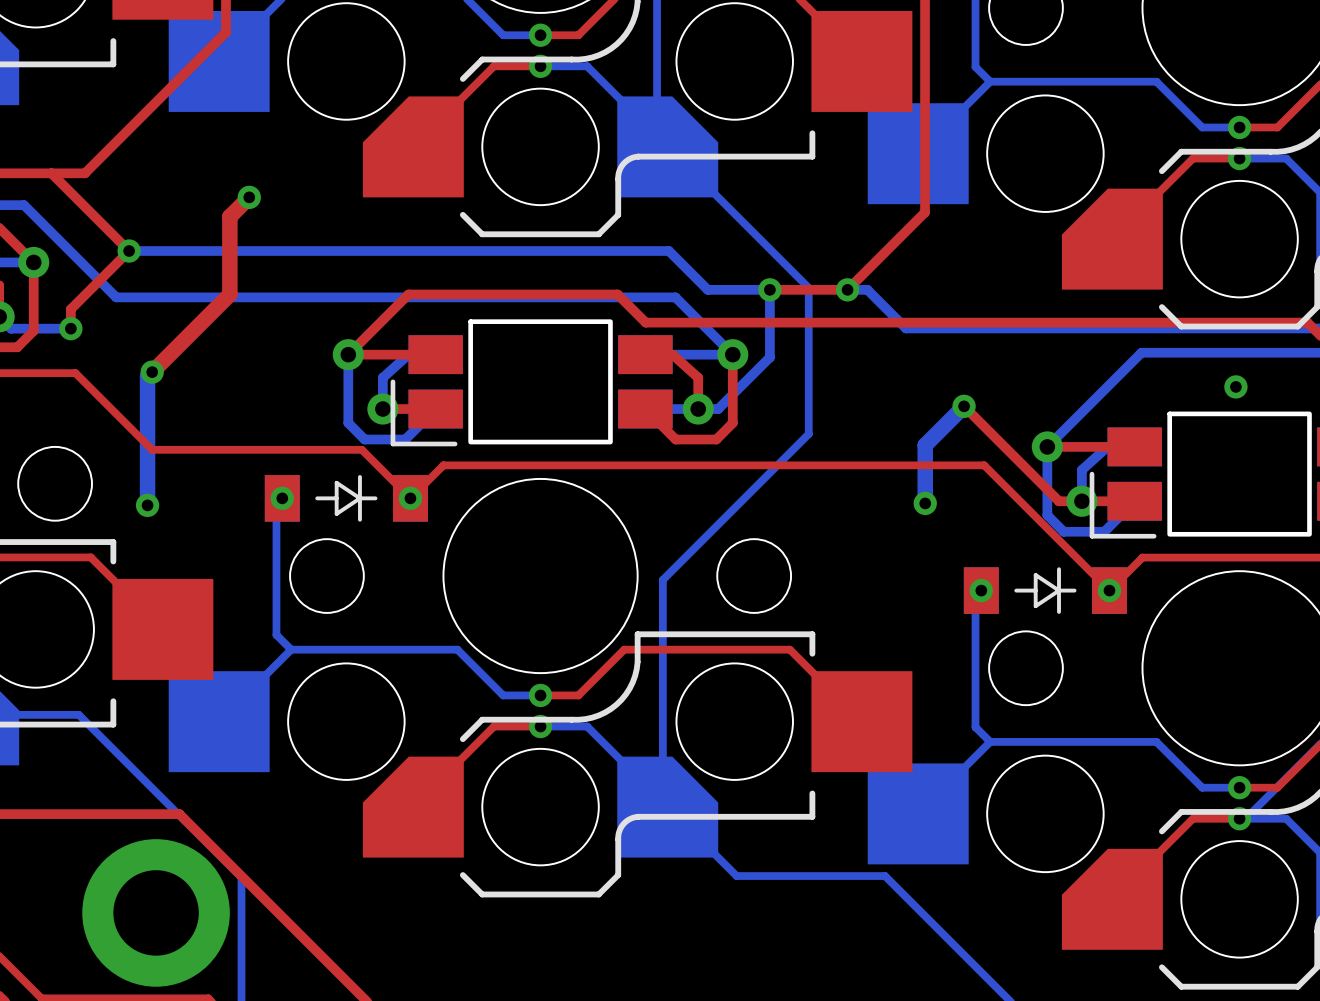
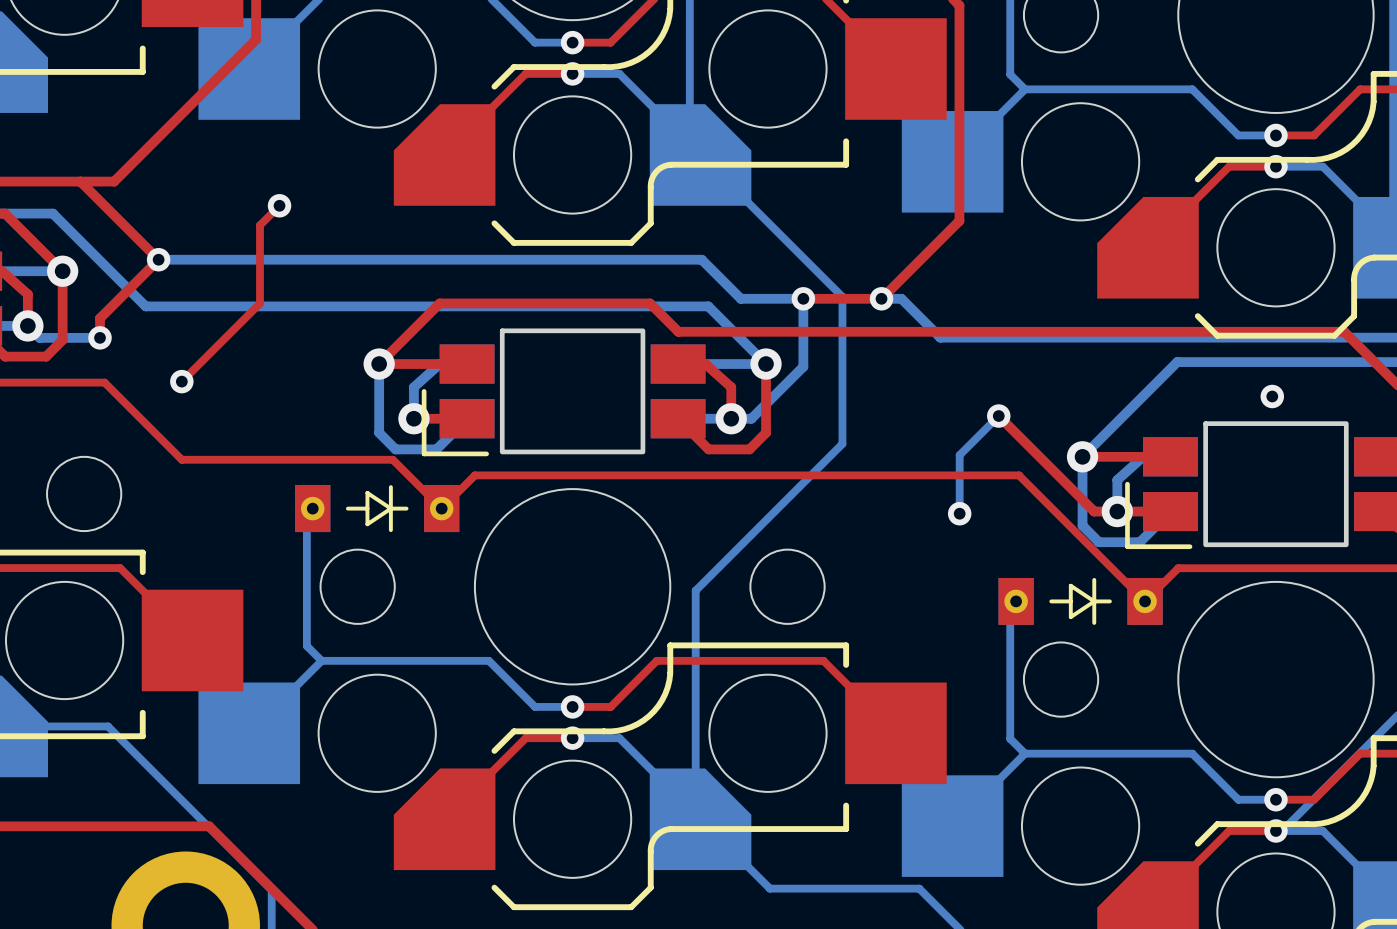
top track width: thick (249, 197) (229, 216) (229, 294) (152, 372) -> thin (279, 205) (259, 225) (259, 303) (181, 381)
bottom track: (152, 372) (147, 376) (147, 505) -> none
bottom track width: thick (964, 406) (925, 445) (925, 503) -> thin (998, 416) (959, 455) (959, 513)
via: (147, 505) -> none

